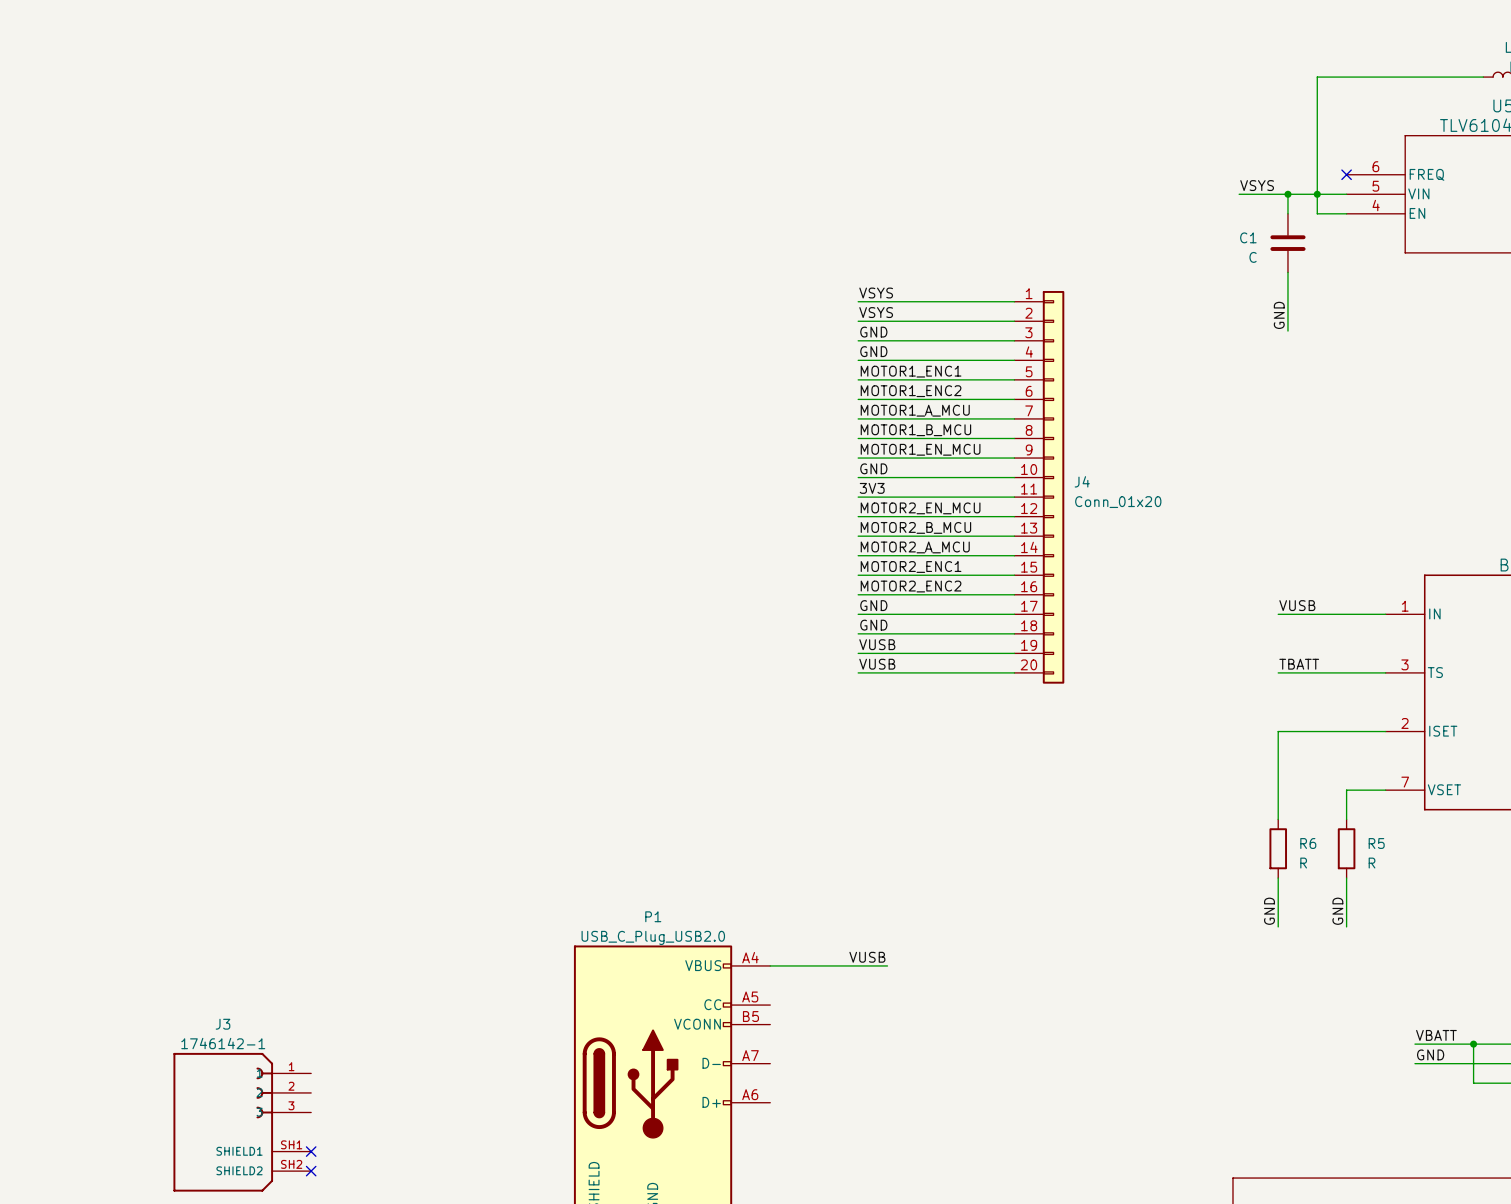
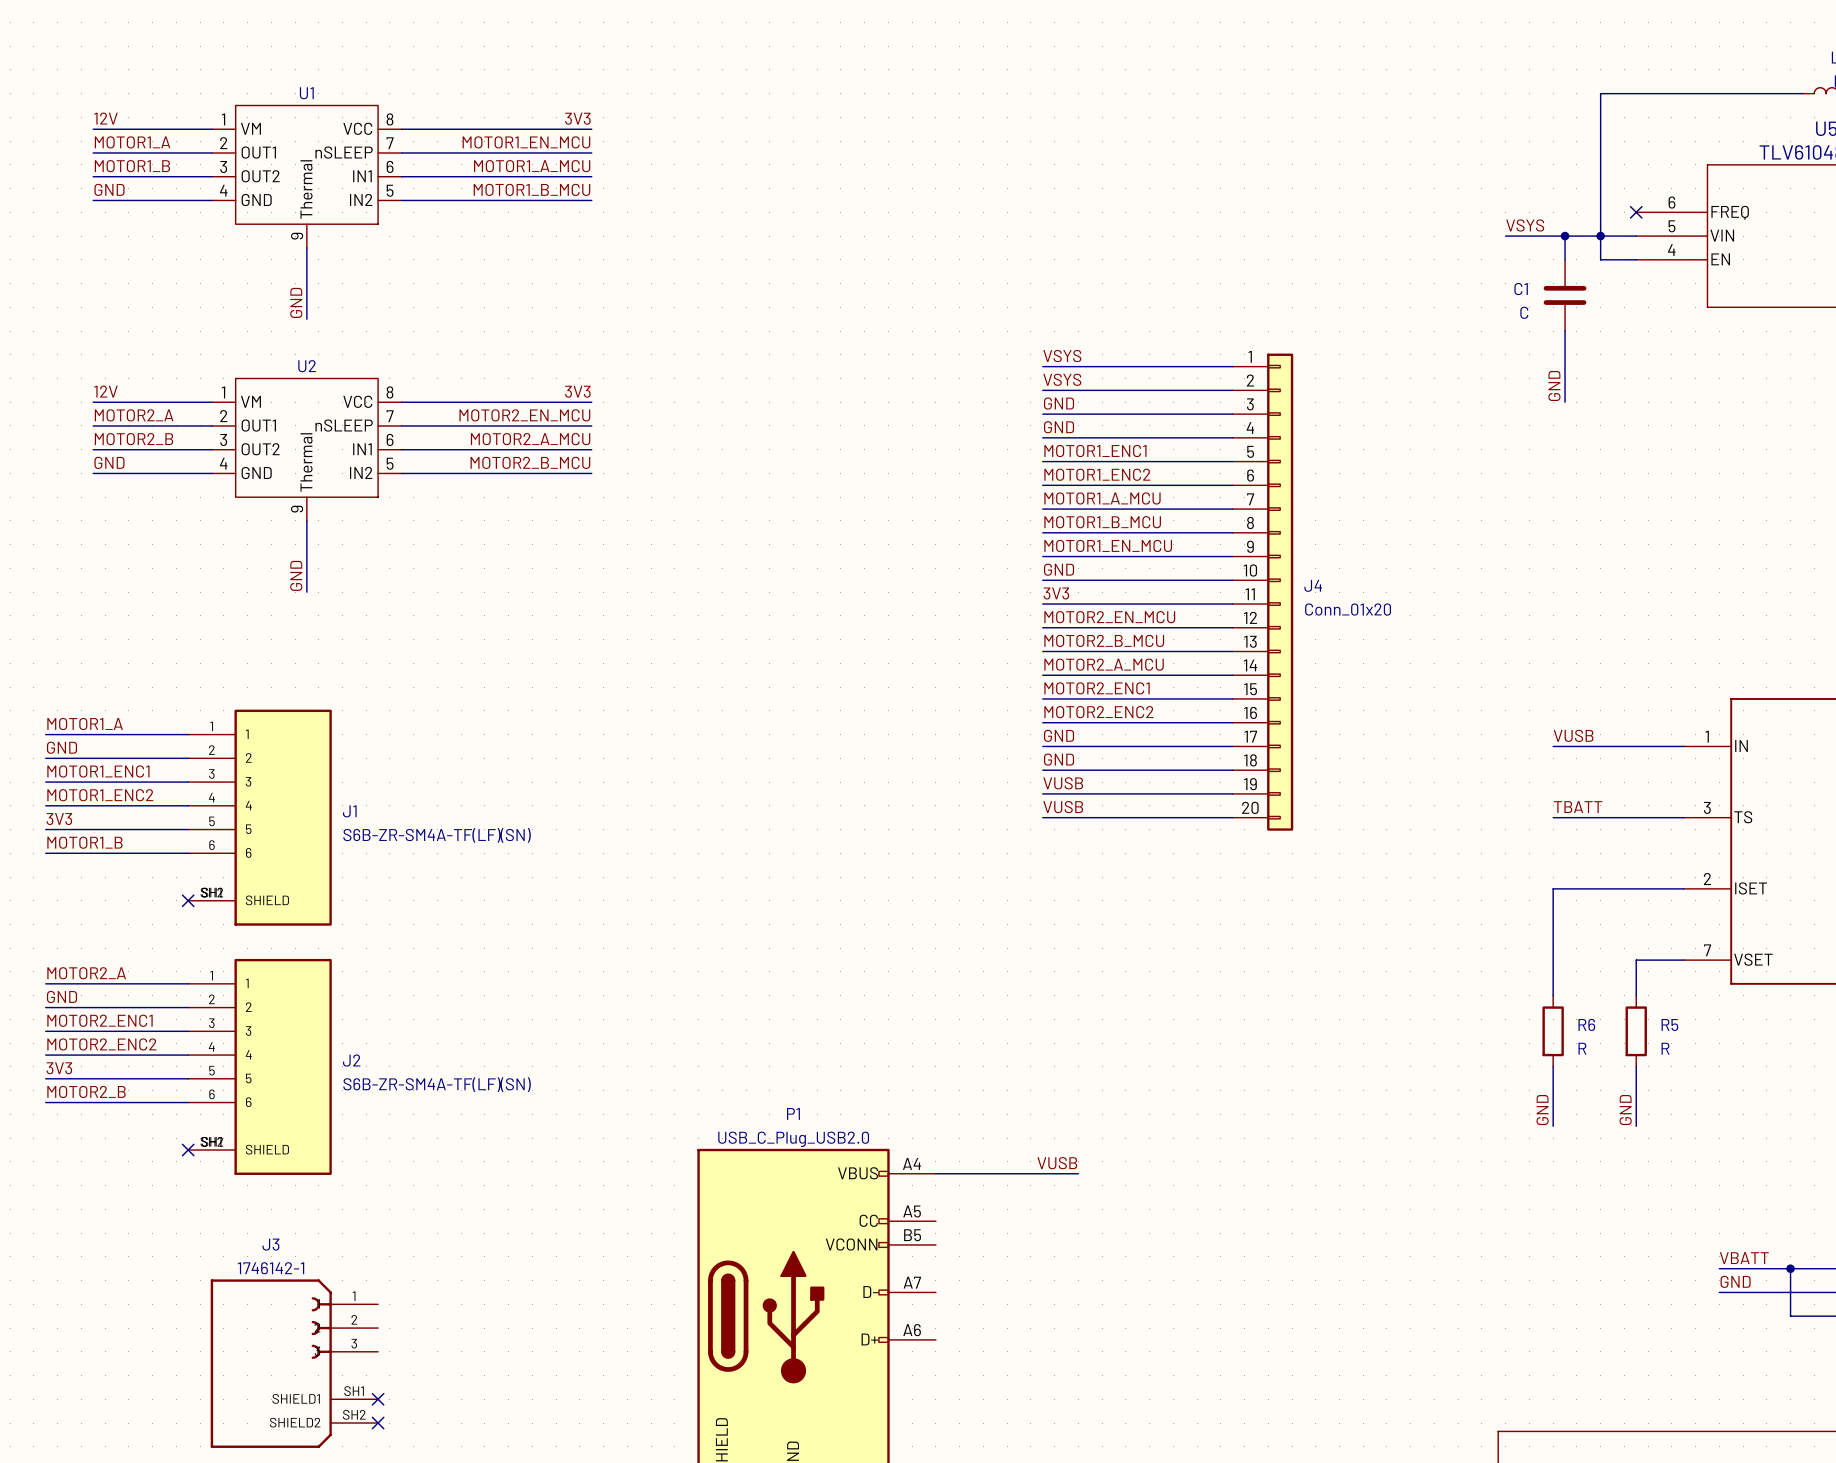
label: none -> 12V (105, 118)
label: none -> 3V3 (577, 118)
wire: none -> (93, 129) (211, 129)
wire: none -> (401, 129) (591, 129)
label: none -> MOTOR1_A (132, 142)
label: none -> MOTOR1_EN_MCU (526, 142)
wire: none -> (93, 152) (211, 152)
wire: none -> (401, 152) (591, 152)
label: none -> MOTOR1_B (132, 166)
label: none -> MOTOR1_A_MCU (532, 166)
wire: none -> (93, 176) (211, 176)
U1: none -> (306, 176)
wire: none -> (401, 176) (591, 176)
label: none -> GND (109, 189)
label: none -> MOTOR1_B_MCU (531, 189)
wire: none -> (93, 200) (211, 200)
wire: none -> (401, 200) (591, 200)
wire: none -> (306, 247) (306, 319)
label: none -> GND (296, 302)
label: none -> 12V (105, 391)
label: none -> 3V3 (577, 391)
wire: none -> (93, 402) (211, 402)
wire: none -> (401, 402) (591, 402)
label: none -> MOTOR2_A (134, 415)
label: none -> MOTOR2_EN_MCU (524, 415)
wire: none -> (93, 425) (211, 425)
wire: none -> (401, 425) (591, 425)
label: none -> MOTOR2_B (133, 439)
label: none -> MOTOR2_A_MCU (530, 439)
wire: none -> (93, 449) (211, 449)
U2: none -> (306, 449)
wire: none -> (401, 449) (591, 449)
label: none -> GND (109, 462)
label: none -> MOTOR2_B_MCU (530, 462)
wire: none -> (93, 473) (211, 473)
wire: none -> (401, 473) (591, 473)
wire: none -> (306, 520) (306, 592)
label: none -> GND (296, 575)
label: none -> MOTOR1_A (85, 723)
wire: none -> (45, 734) (188, 734)
label: none -> GND (62, 747)
wire: none -> (45, 758) (188, 758)
label: none -> MOTOR1_ENC1 (98, 771)
wire: none -> (45, 782) (188, 782)
label: none -> MOTOR1_ENC2 (100, 795)
wire: none -> (45, 805) (188, 805)
J1: none -> S6B-ZR-SM4A-TF(LF)(SN) (259, 817)
label: none -> 3V3 (59, 819)
wire: none -> (45, 829) (188, 829)
label: none -> MOTOR1_B (84, 842)
wire: none -> (45, 853) (188, 853)
no-connect mark: none -> (188, 900)
label: none -> MOTOR2_A (86, 973)
wire: none -> (45, 983) (188, 983)
label: none -> GND (62, 996)
wire: none -> (45, 1007) (188, 1007)
label: none -> MOTOR2_ENC1 (100, 1020)
wire: none -> (45, 1031) (188, 1031)
label: none -> MOTOR2_ENC2 (101, 1044)
wire: none -> (45, 1055) (188, 1055)
J2: none -> S6B-ZR-SM4A-TF(LF)(SN) (259, 1066)
label: none -> 3V3 (59, 1068)
wire: none -> (45, 1078) (188, 1078)
label: none -> MOTOR2_B (86, 1091)
wire: none -> (45, 1102) (188, 1102)
no-connect mark: none -> (188, 1150)

